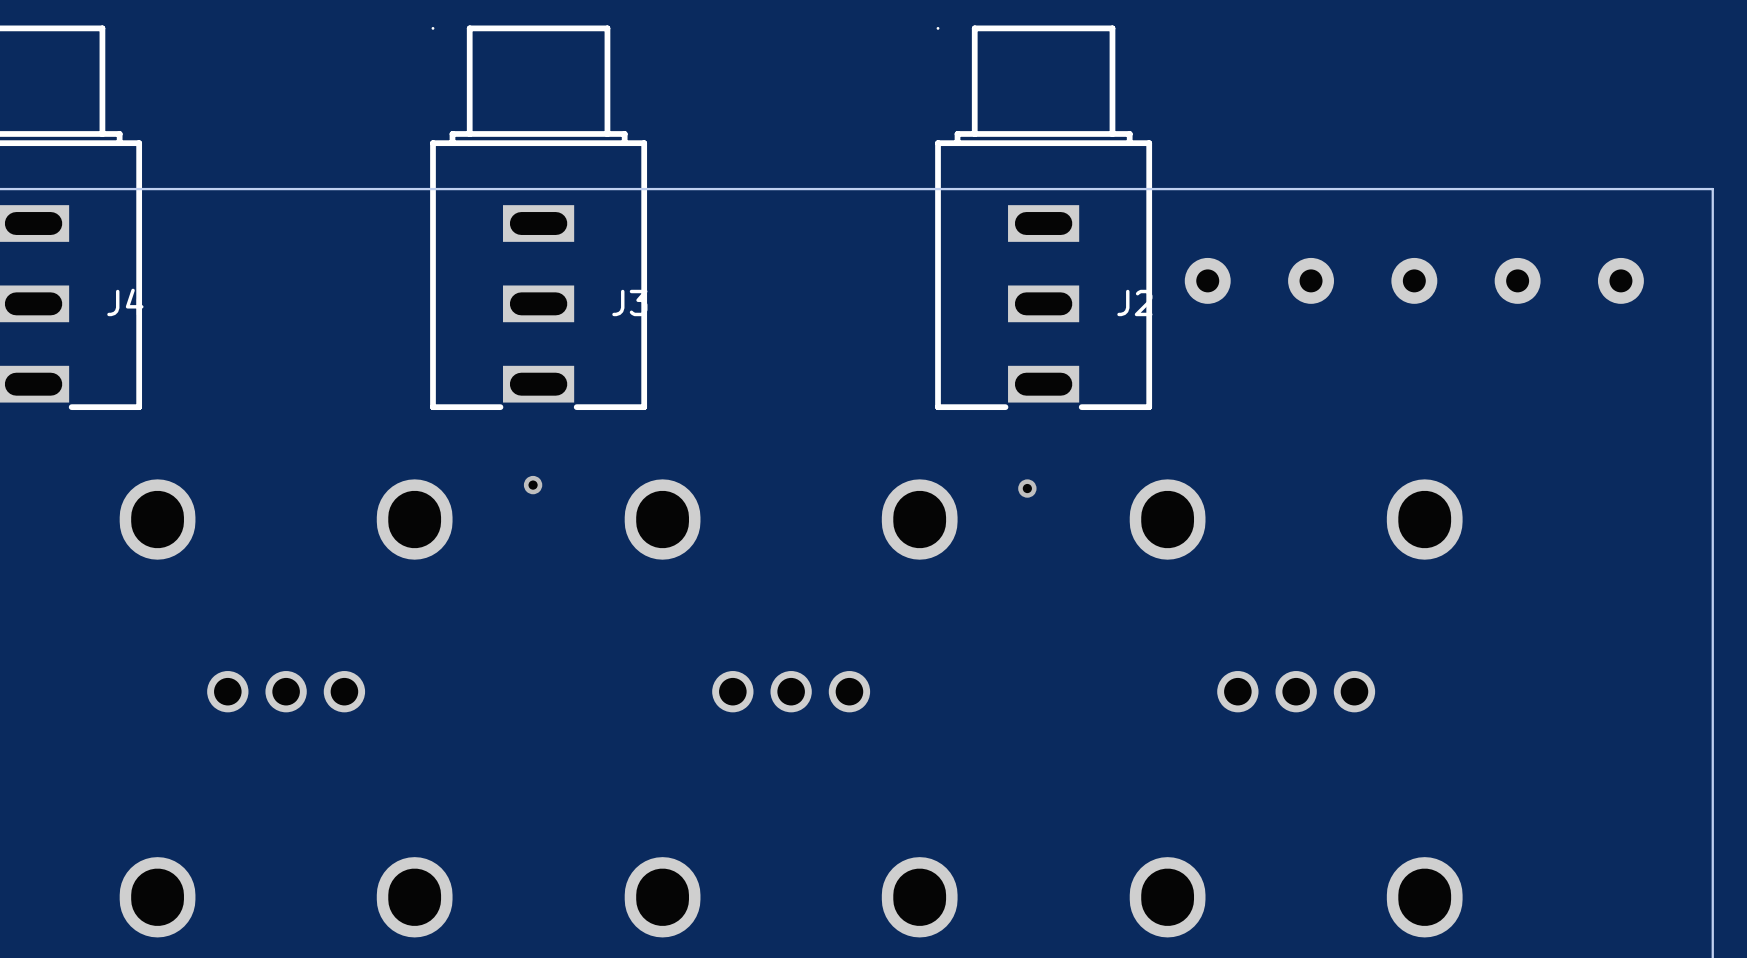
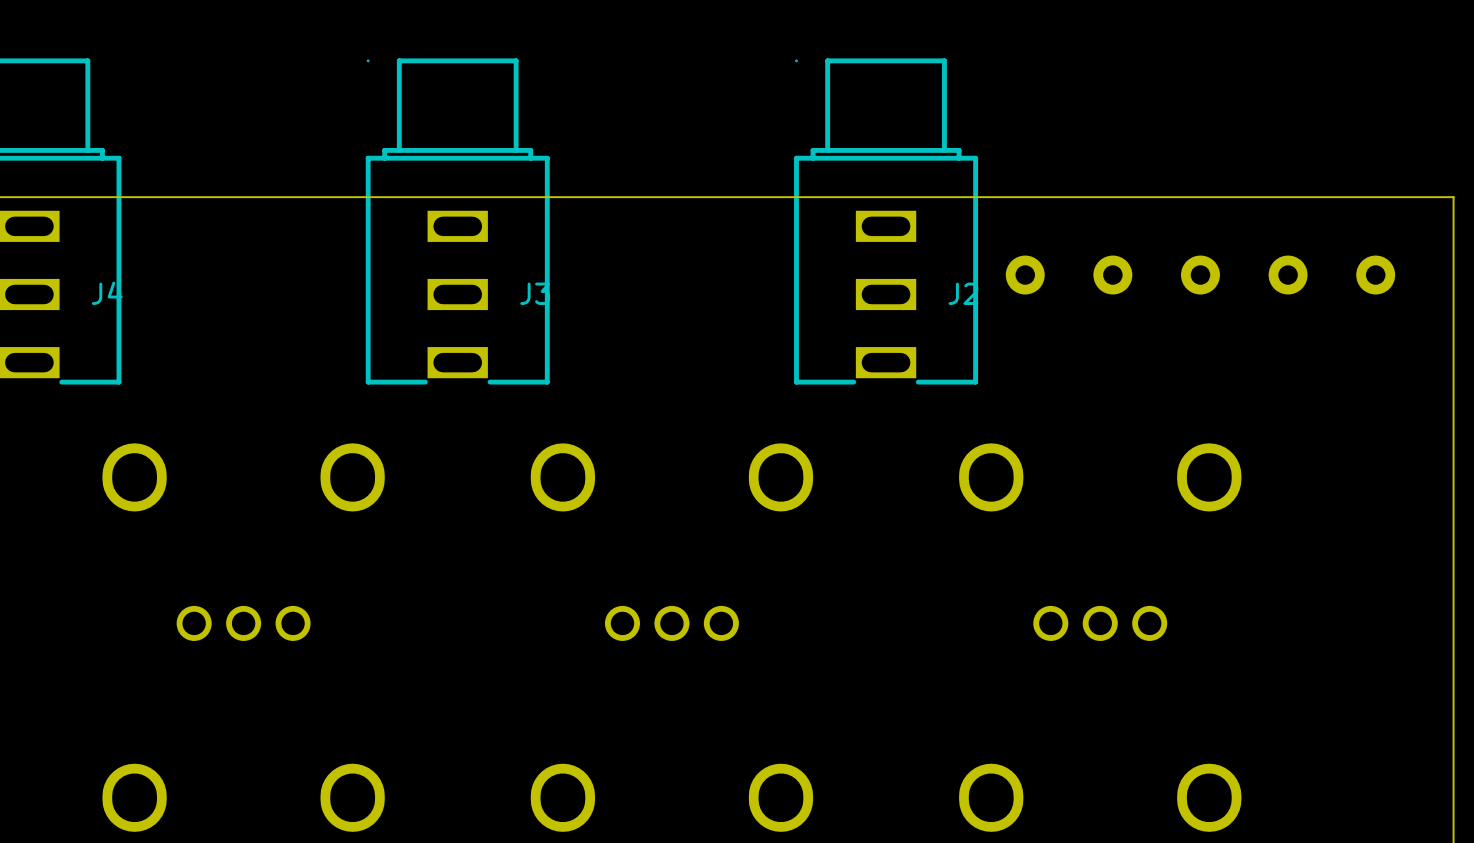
via: (533, 485) -> none
via: (1027, 488) -> none

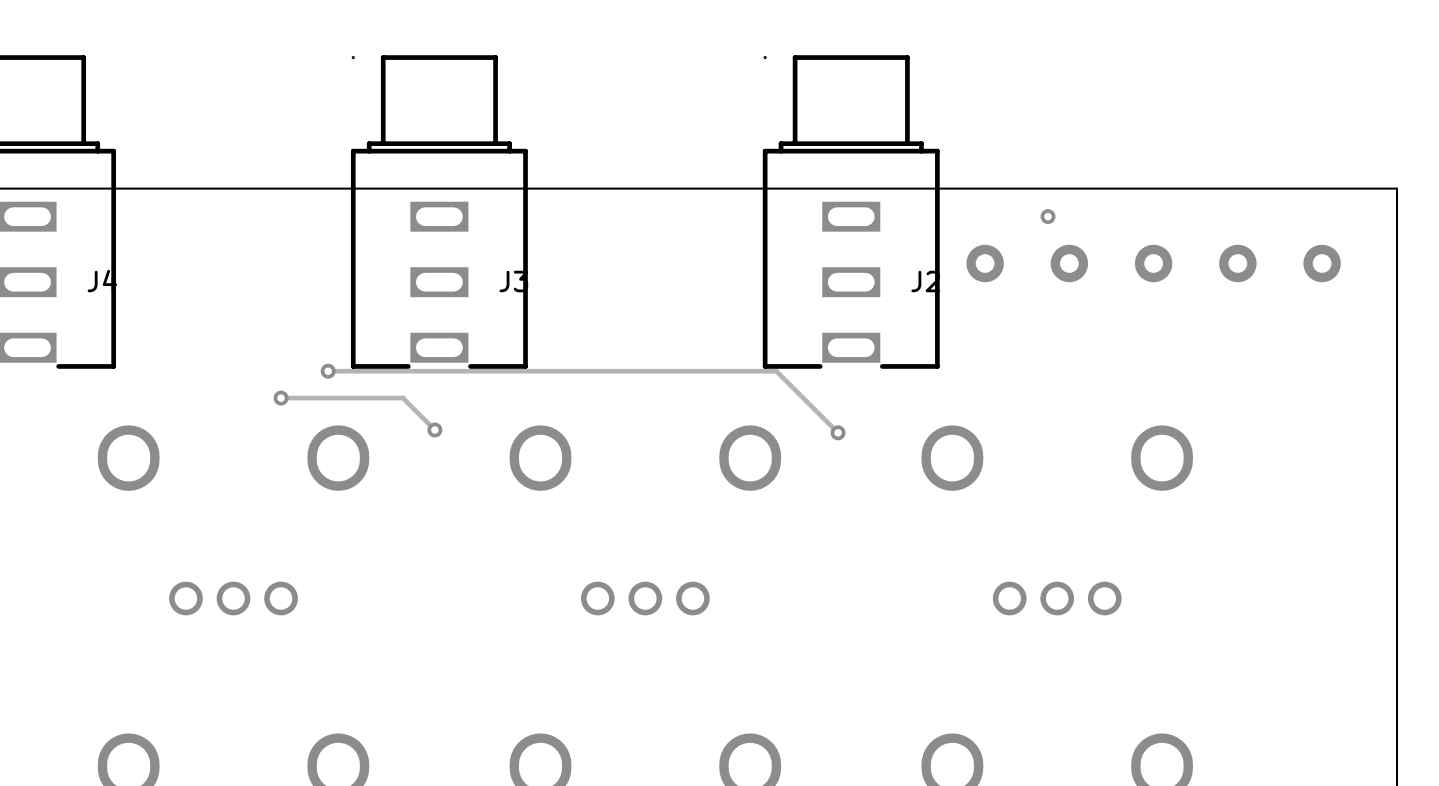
via: none -> (1048, 216)
track: none -> (328, 371) (776, 371) (838, 432)
via: none -> (328, 371)
track: none -> (281, 398) (402, 398) (434, 430)
via: none -> (281, 398)
via: none -> (434, 430)
via: none -> (838, 432)

